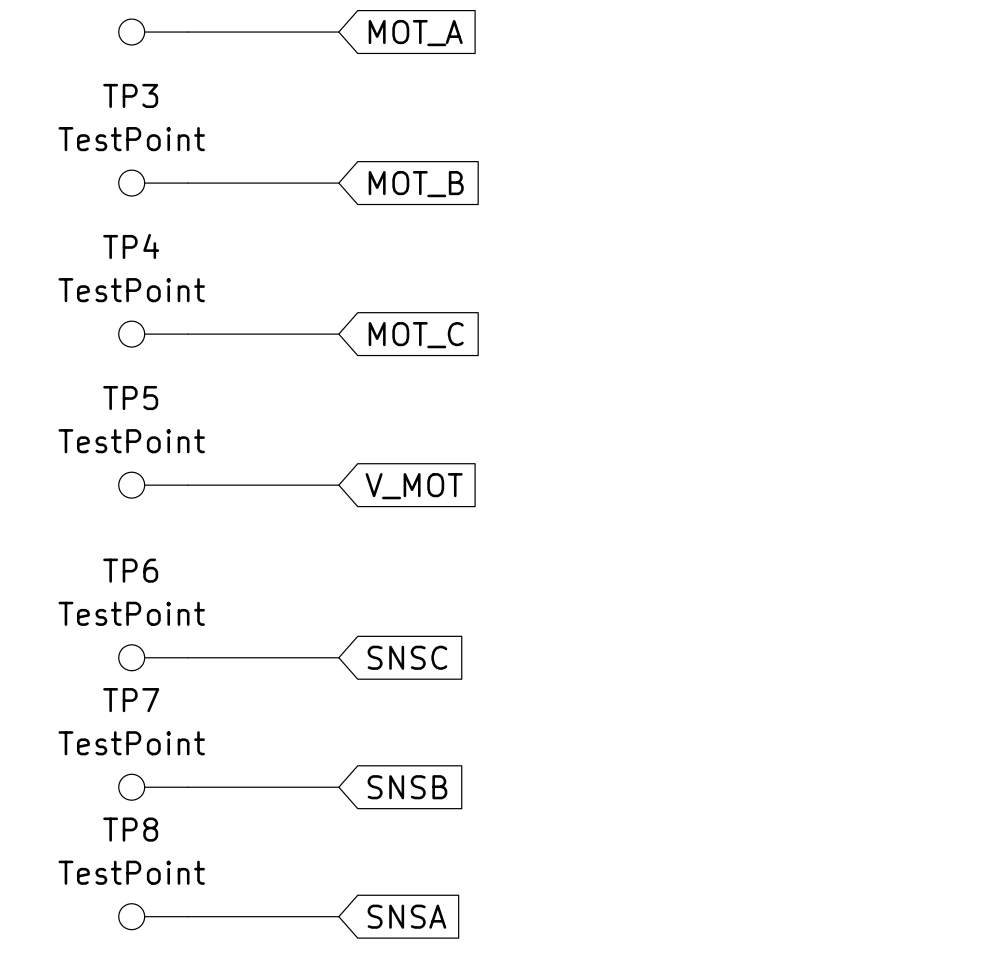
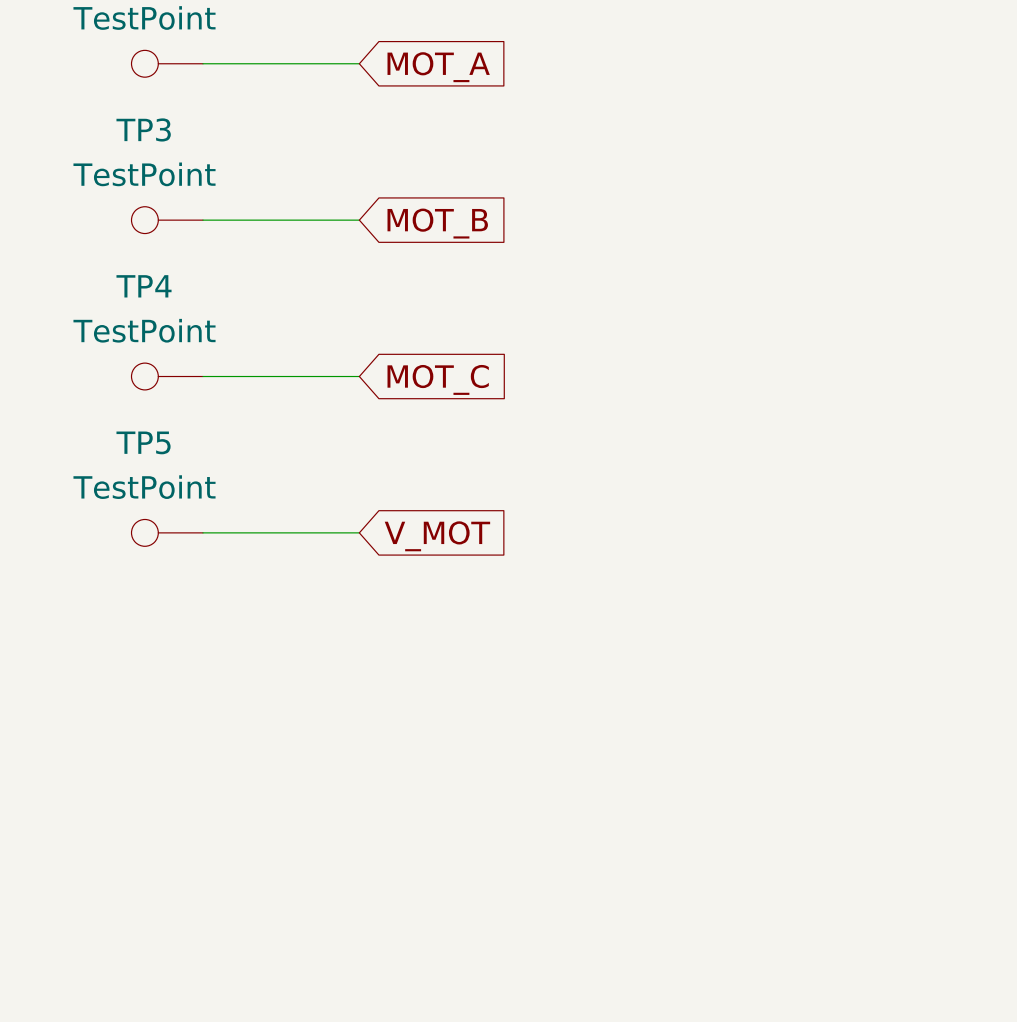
TP6: TestPoint (153, 657) -> none
wire: (187, 657) (338, 657) -> none
global label: SNSC (407, 657) -> none
TP7: TestPoint (153, 787) -> none
wire: (187, 787) (338, 787) -> none
global label: SNSB (407, 787) -> none
TP8: TestPoint (153, 916) -> none
wire: (187, 916) (338, 916) -> none
global label: SNSA (406, 916) -> none

